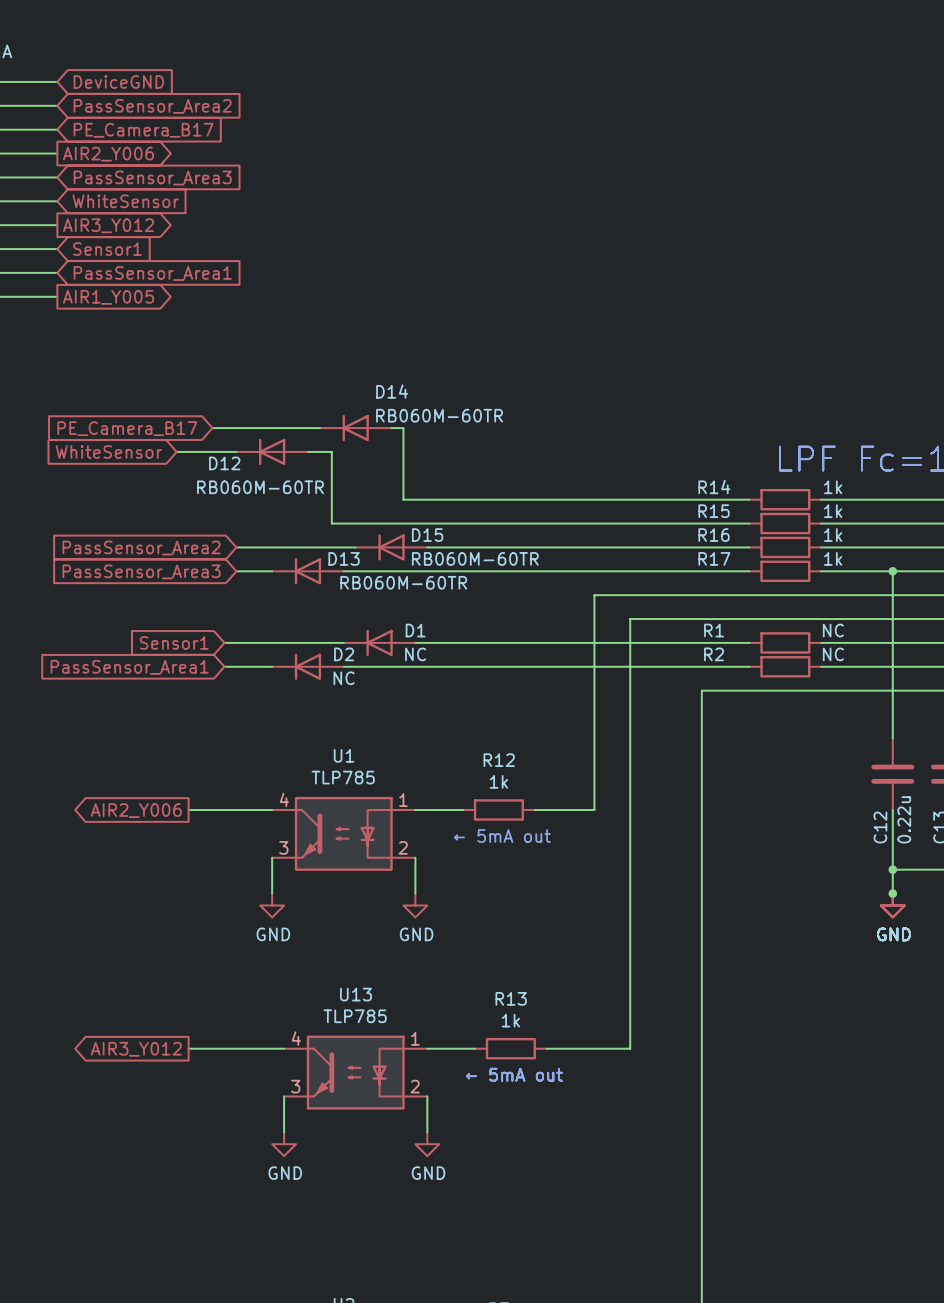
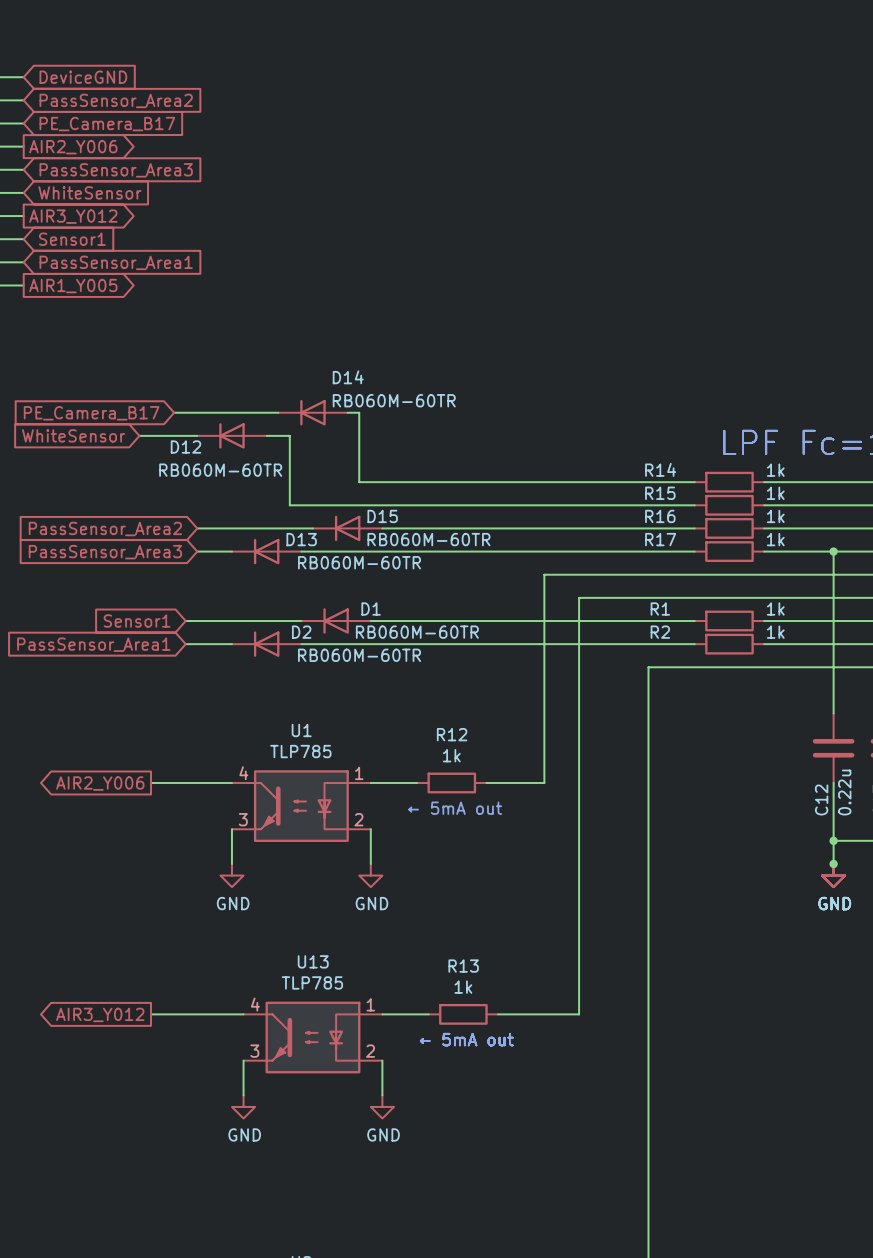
R1 value: NC (833, 630) -> 1k (775, 609)
D1 value: NC (415, 654) -> RB060M-60TR (417, 632)
R2 value: NC (833, 654) -> 1k (775, 632)
D2 value: NC (344, 678) -> RB060M-60TR (359, 655)

